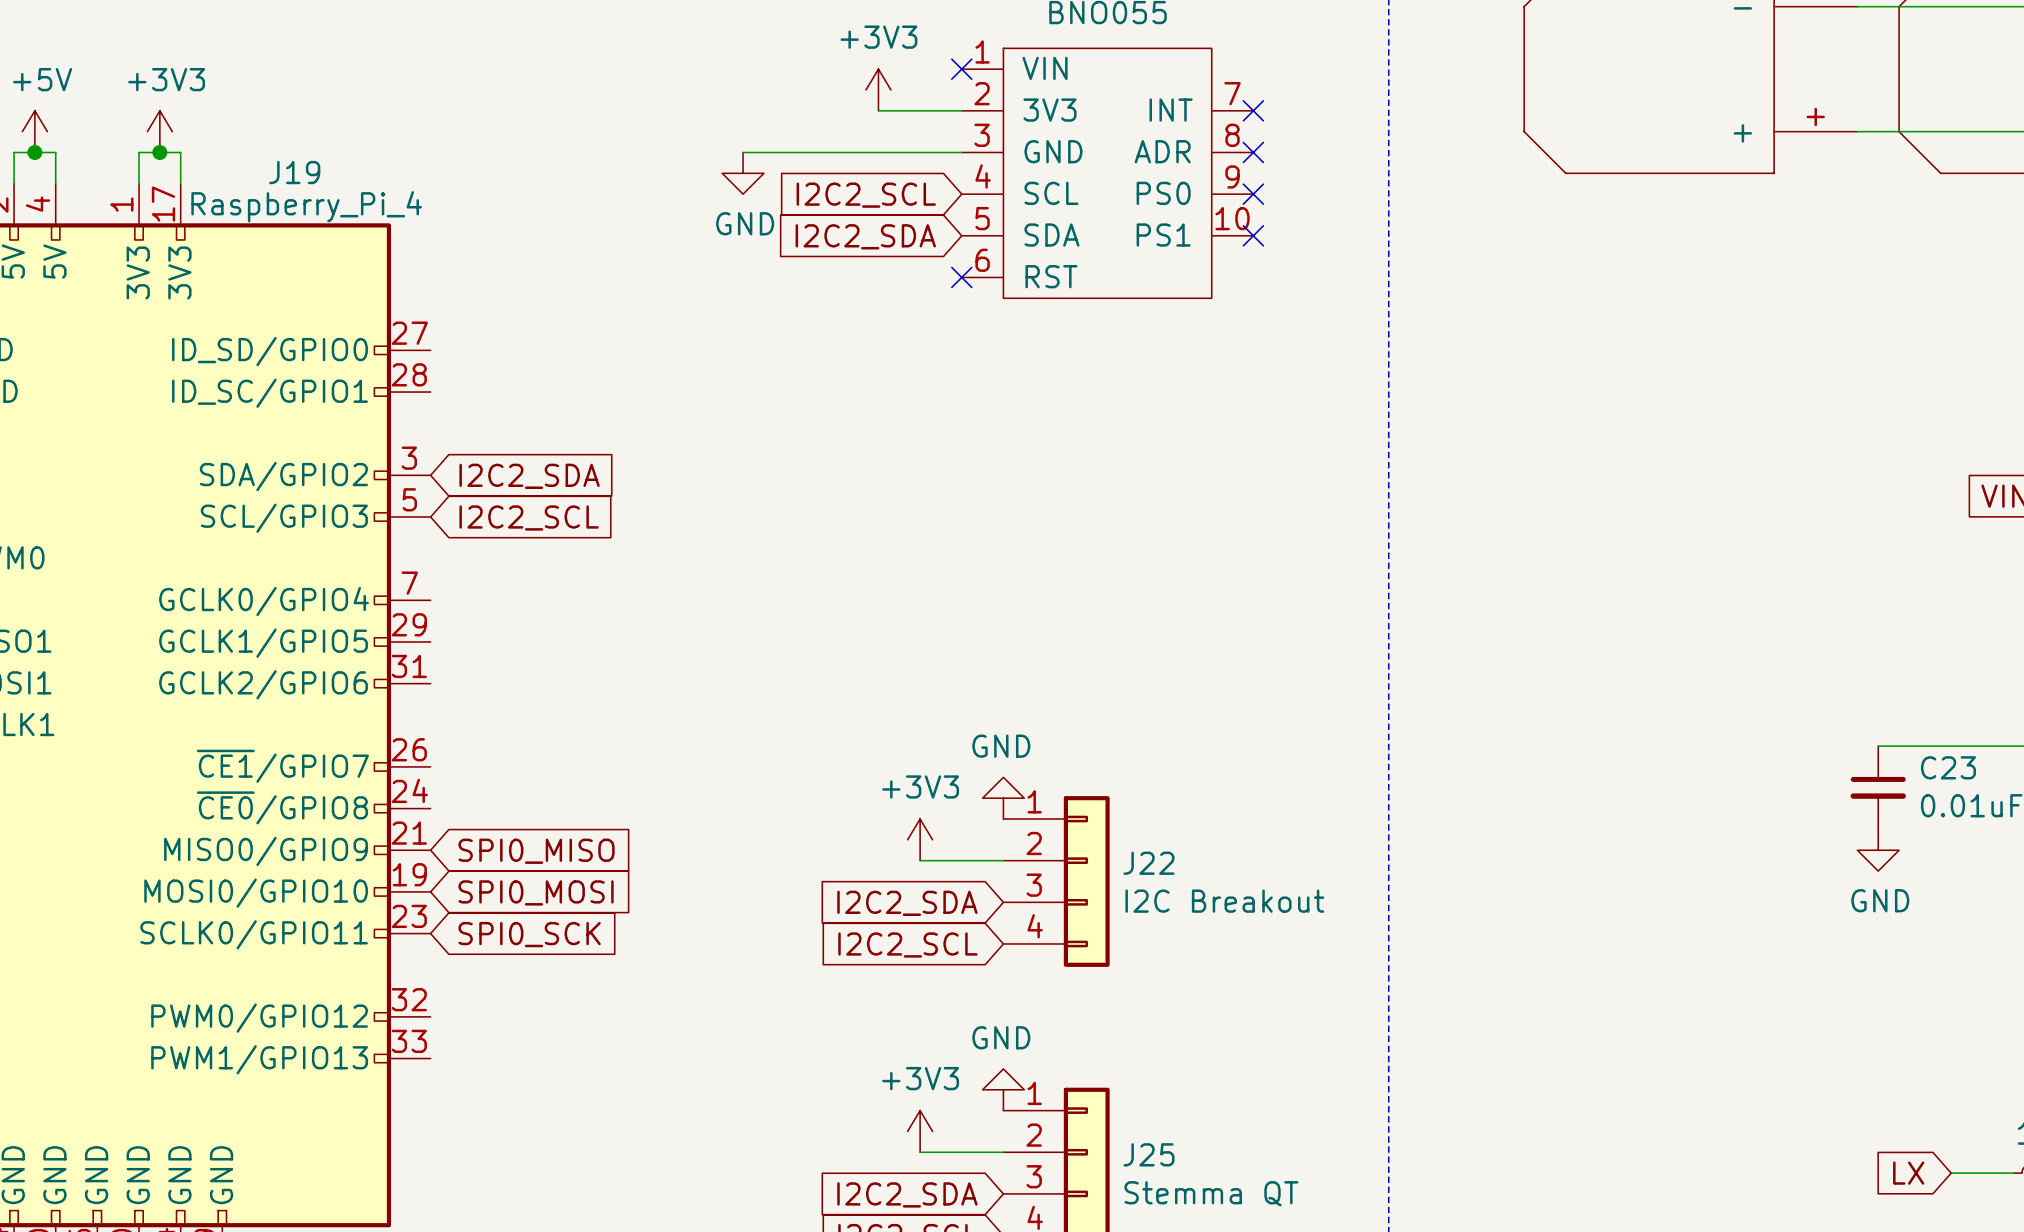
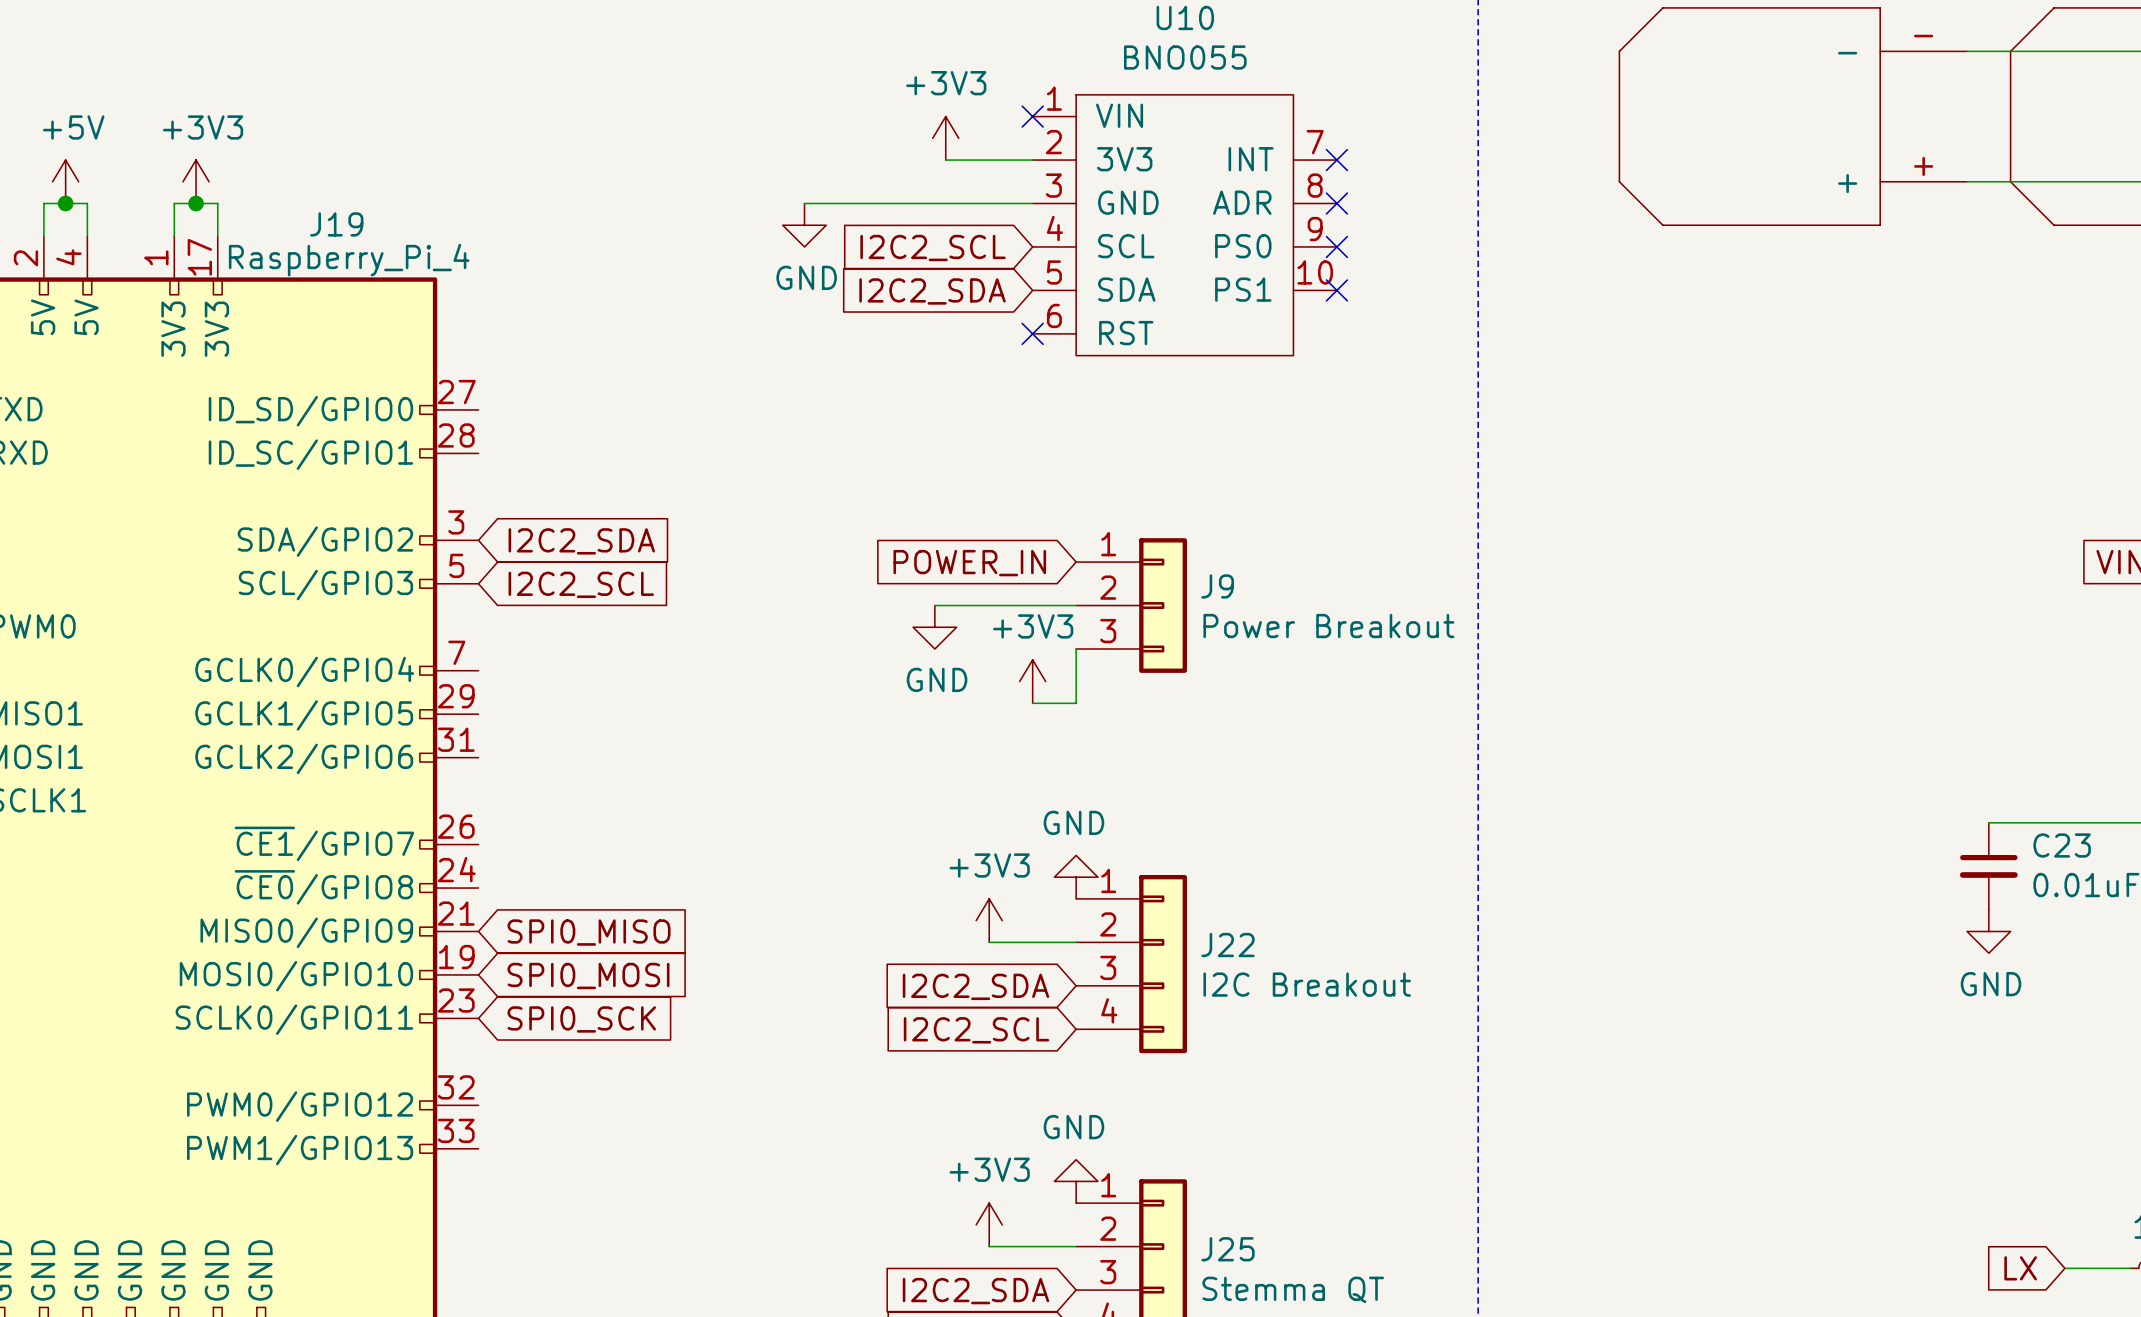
global label: none -> POWER_IN (969, 563)
wire: none -> (934, 605) (1076, 605)
J9: none -> Power Breakout (1131, 605)
power symbol: none -> GND (934, 627)
wire: none -> (1076, 648) (1076, 703) (1032, 703)
power symbol: none -> +3V3 (1032, 681)

